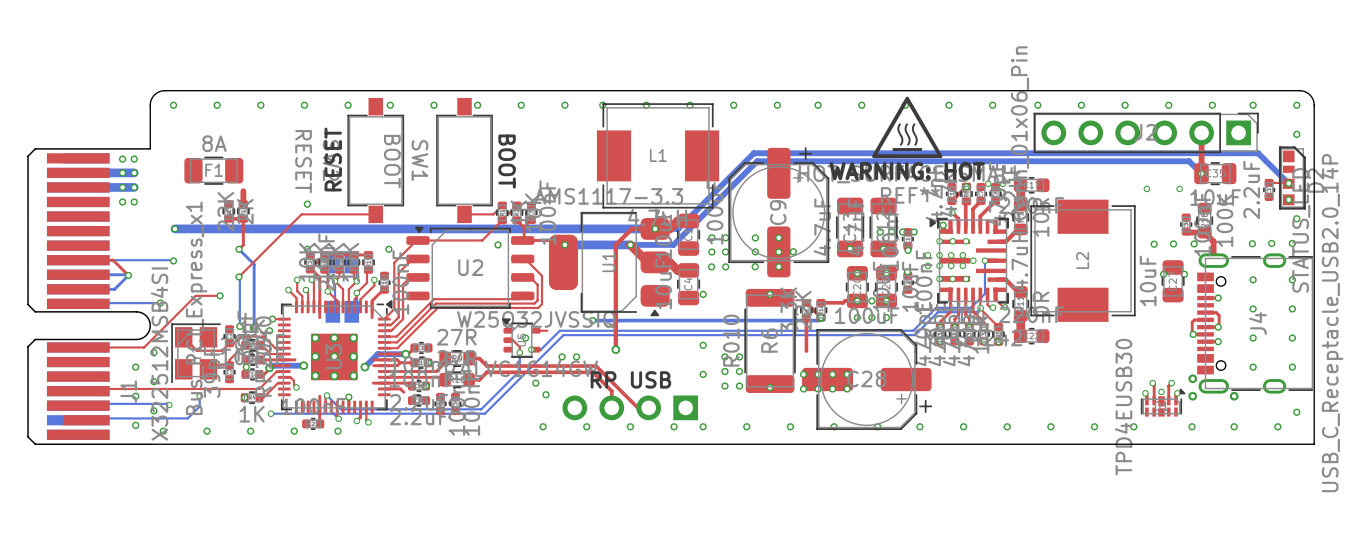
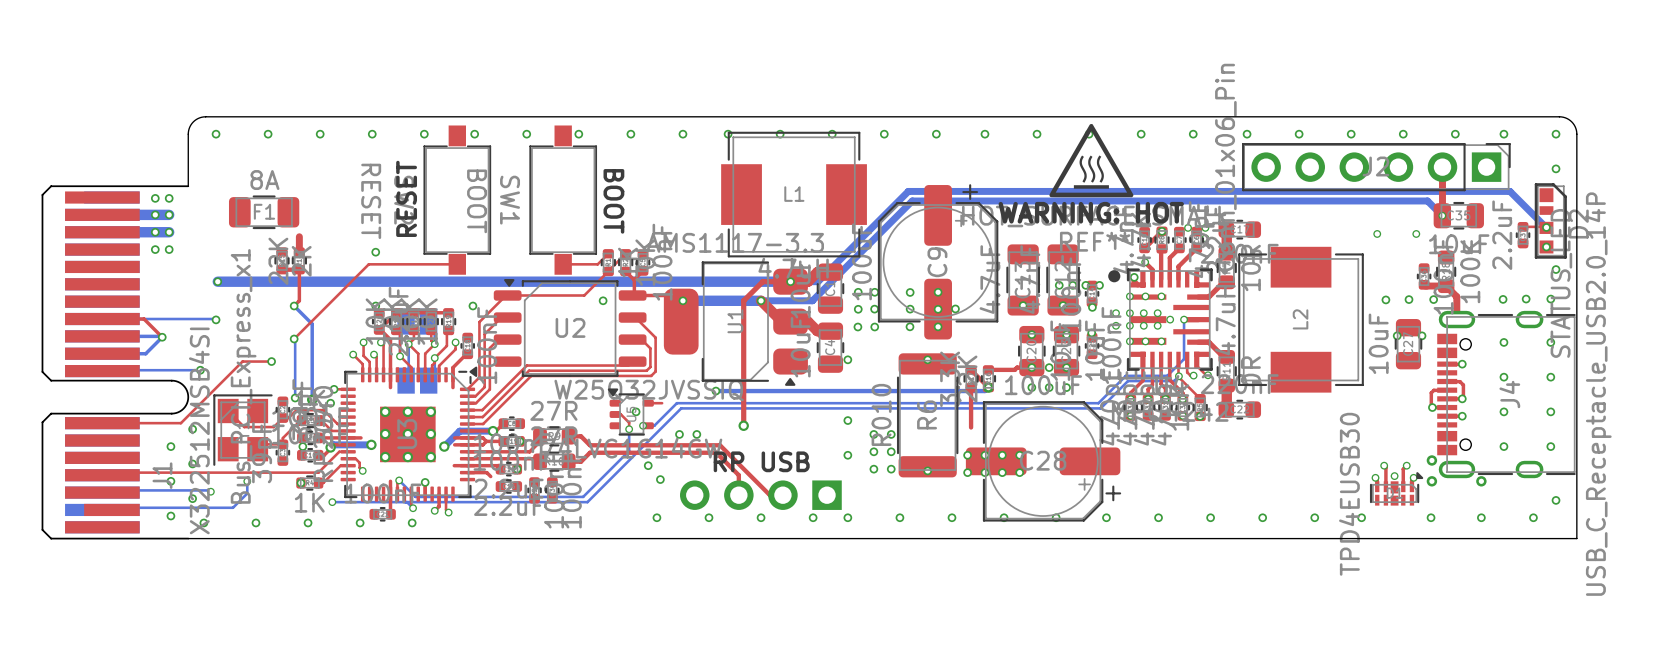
part footprint: [929, 217, 1010, 304] -> [1108, 268, 1213, 371]

